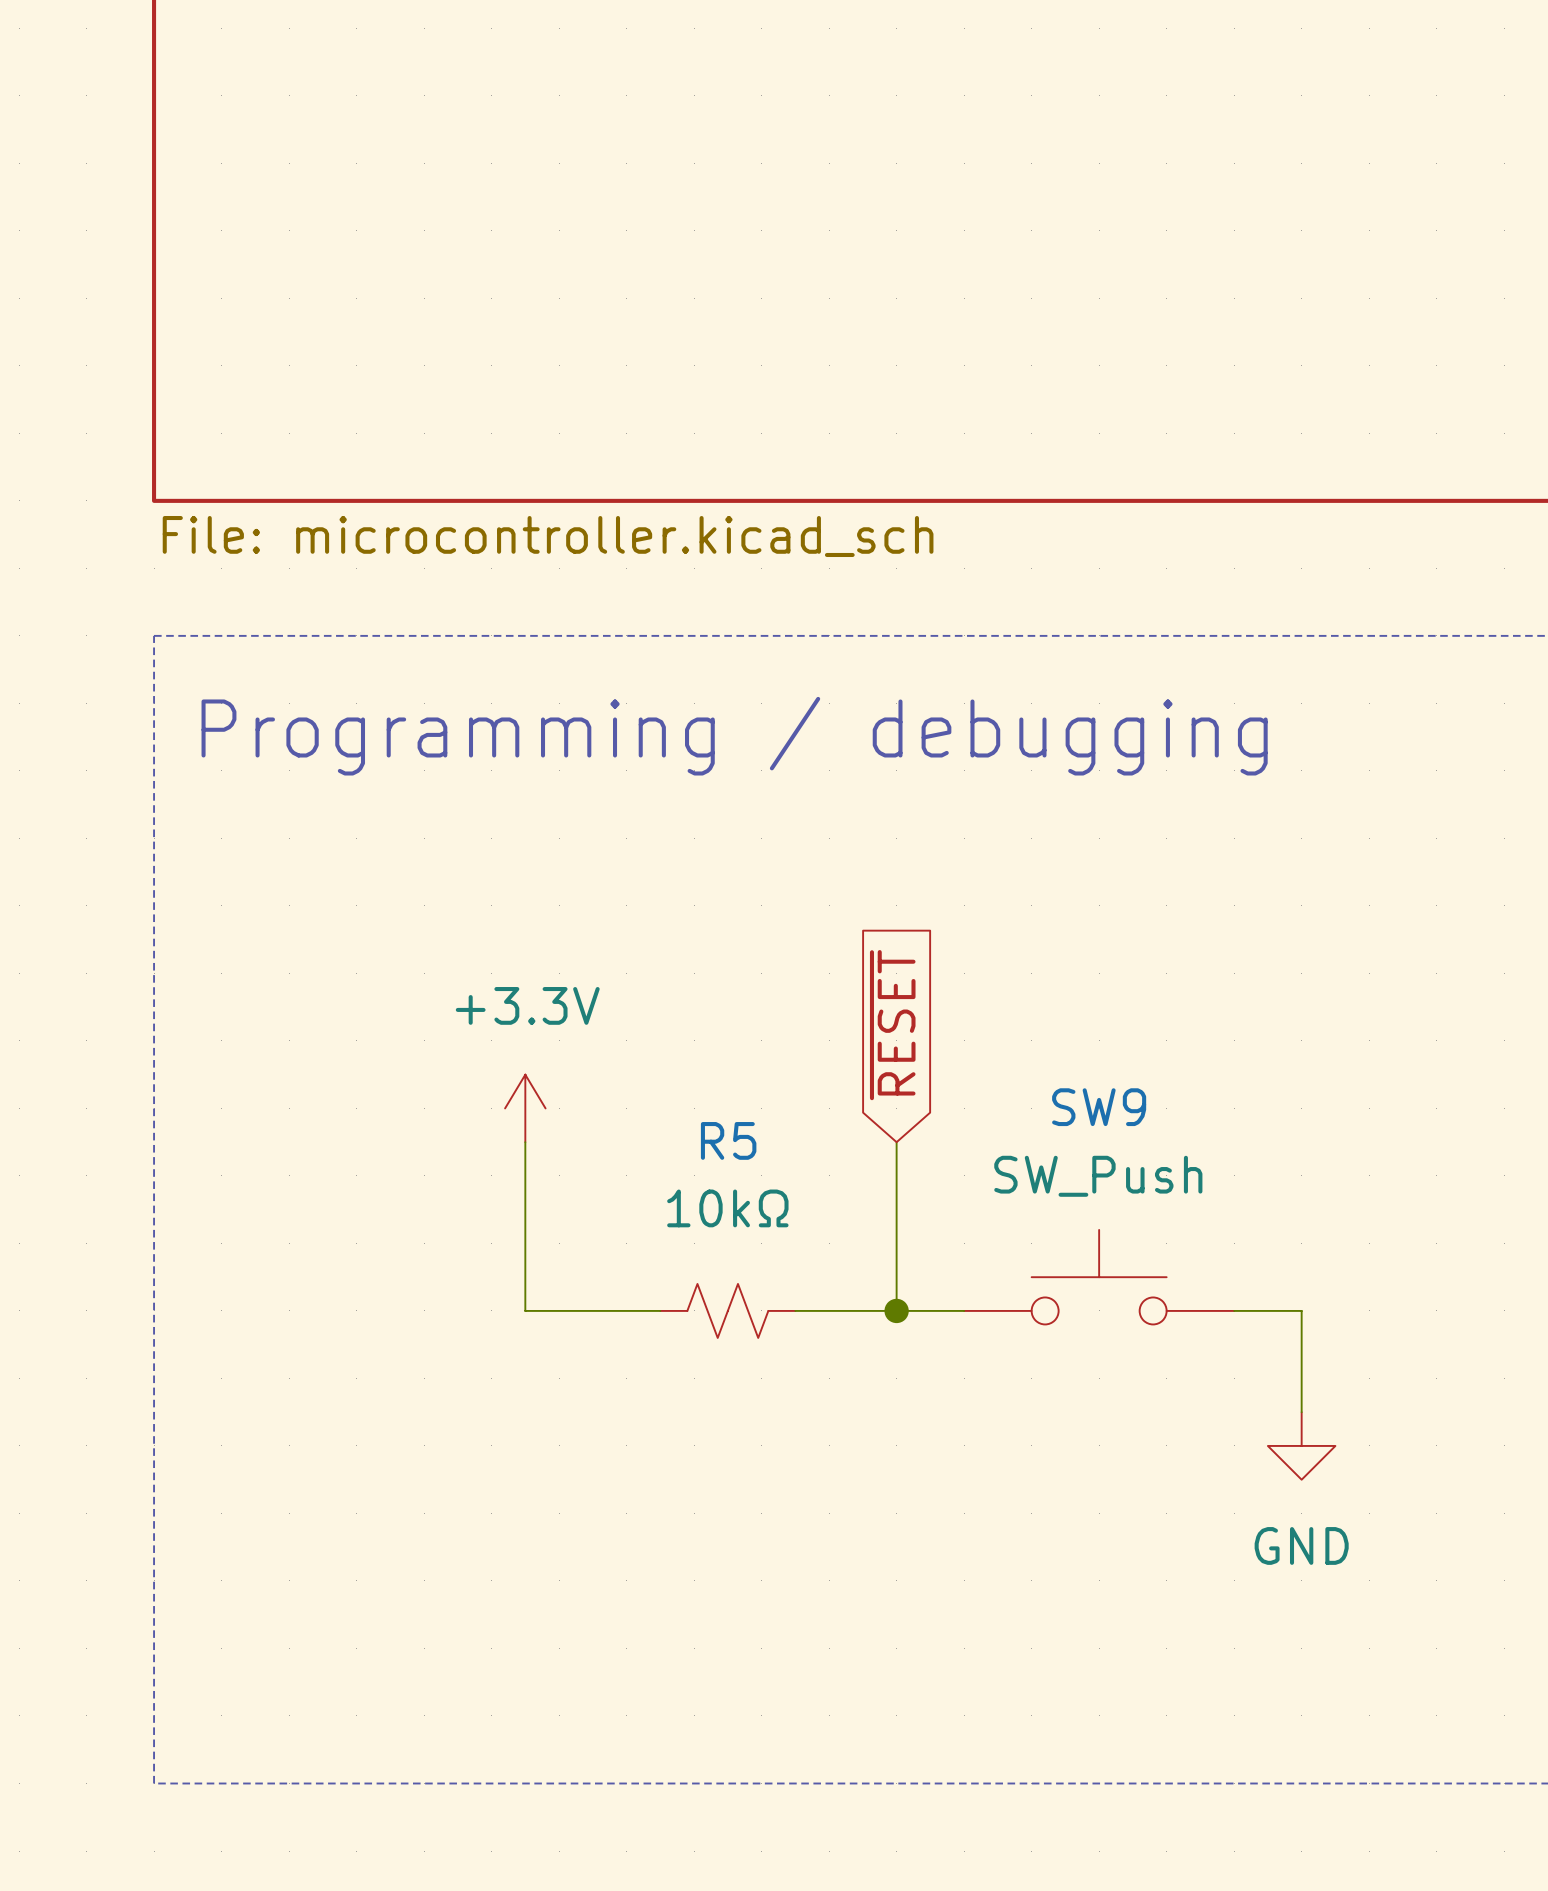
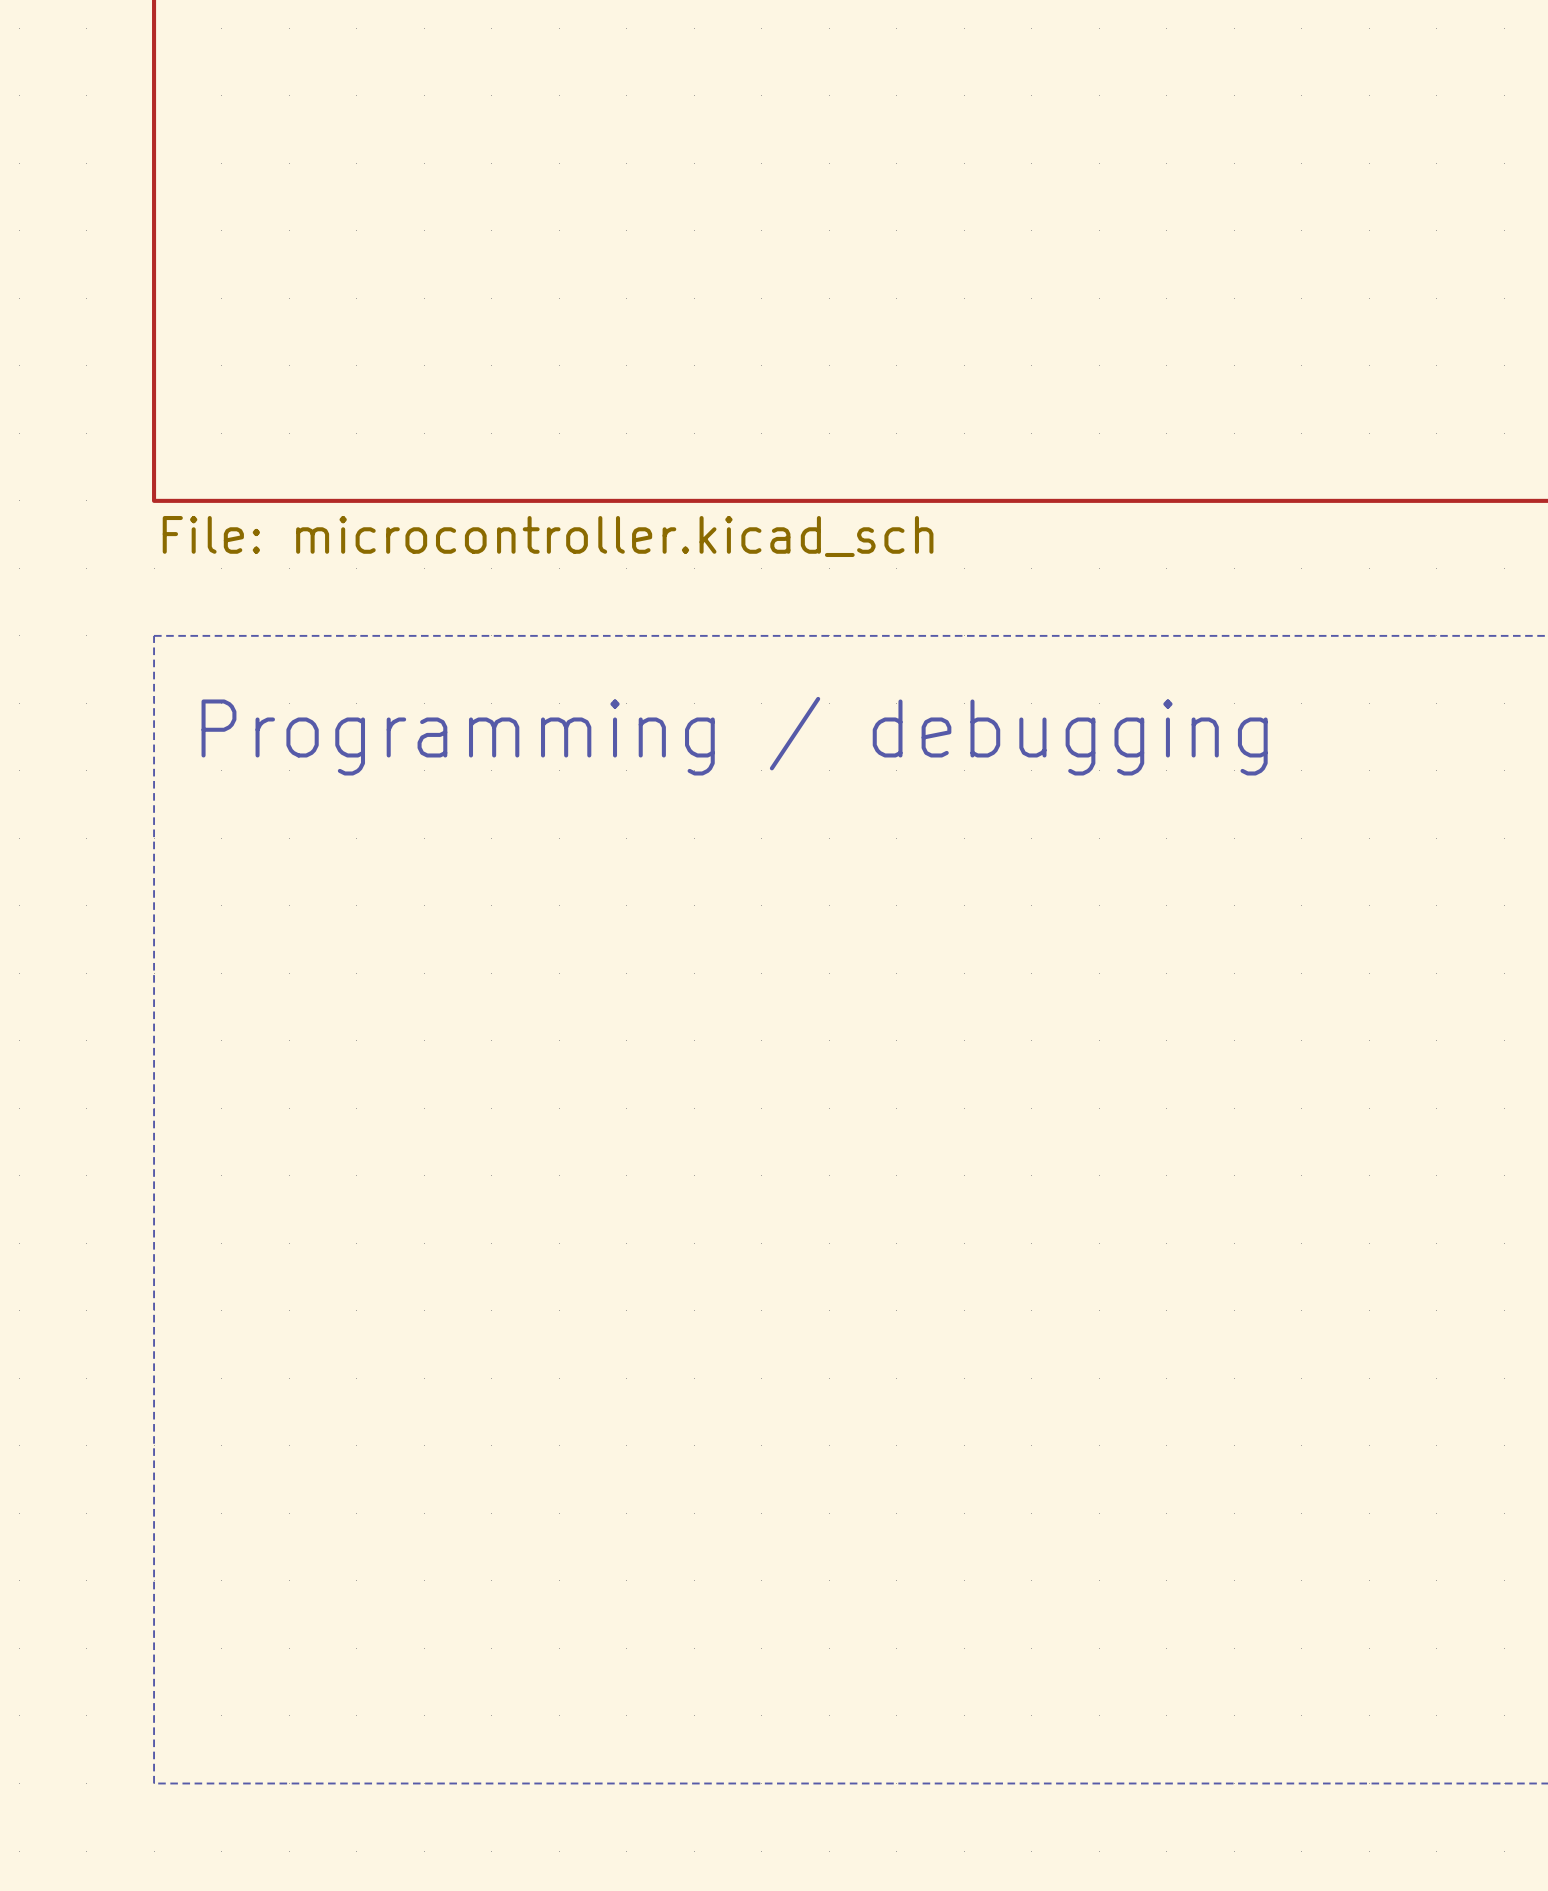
global label: ~{RESET} (892, 1025) -> none
power symbol: +3.3V (525, 1108) -> none
wire: (525, 1142) (525, 1310) (660, 1310) -> none
wire: (896, 1142) (896, 1310) -> none
SW9: SW_Push (1099, 1277) -> none
R5: 10kΩ (727, 1310) -> none
wire: (795, 1310) (964, 1310) -> none
junction: (896, 1310) -> none
wire: (1234, 1310) (1301, 1310) (1301, 1412) -> none
power symbol: GND (1301, 1445) -> none

